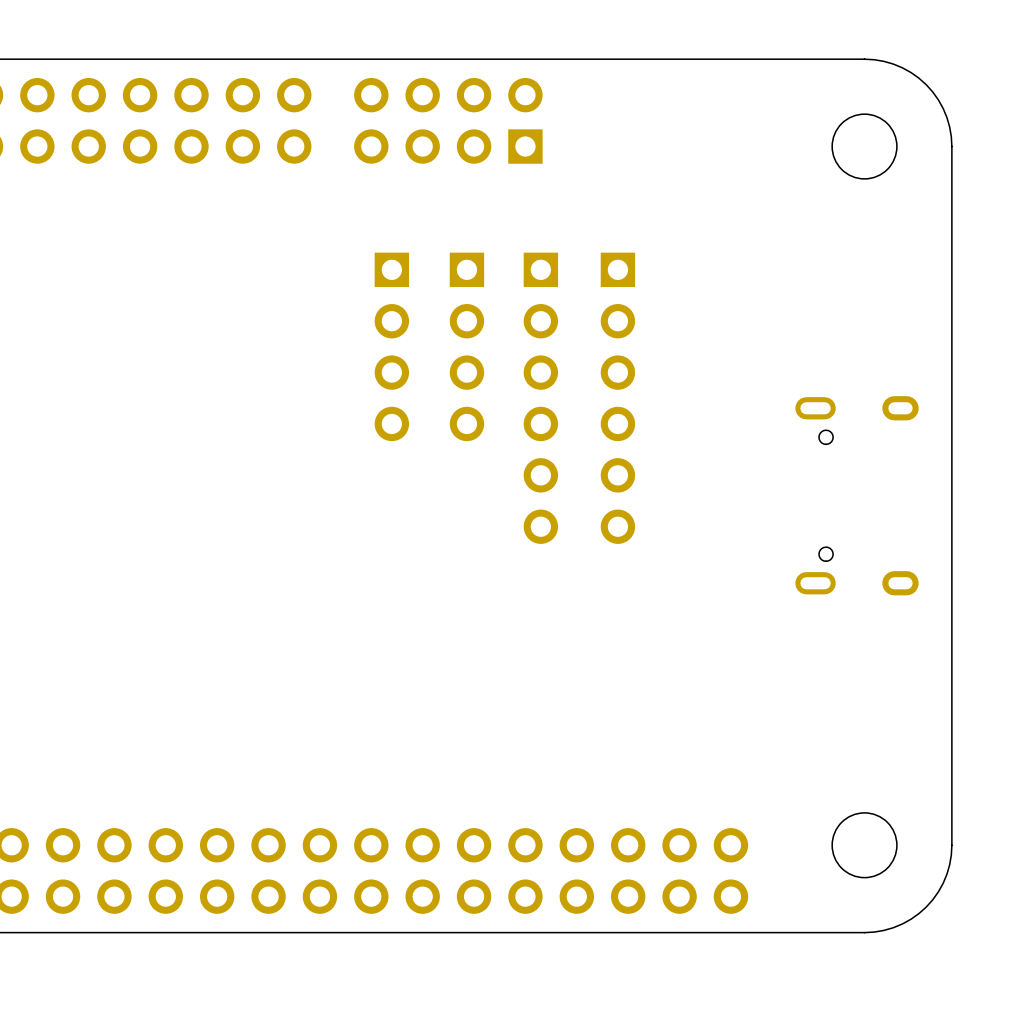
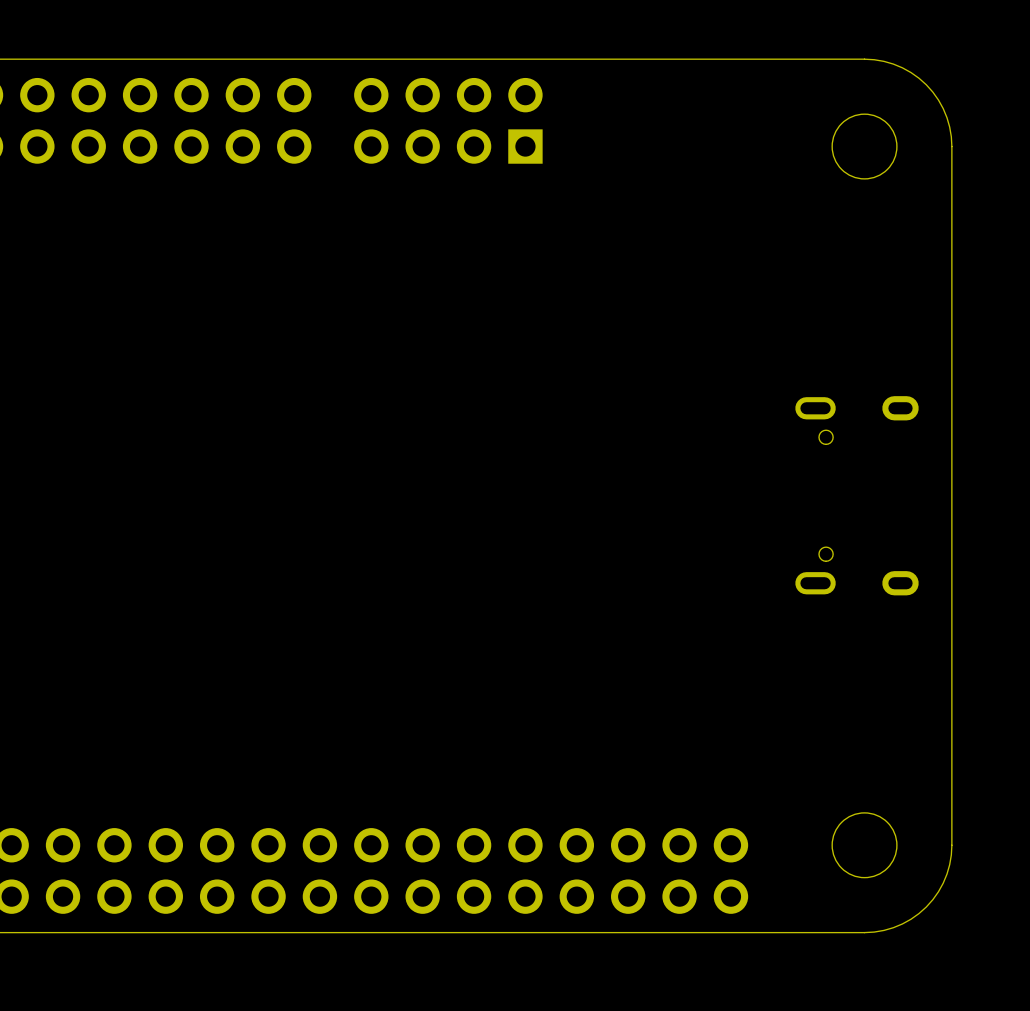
part: (391, 346) -> none
part: (466, 346) -> none
part: (540, 398) -> none
part: (617, 398) -> none

